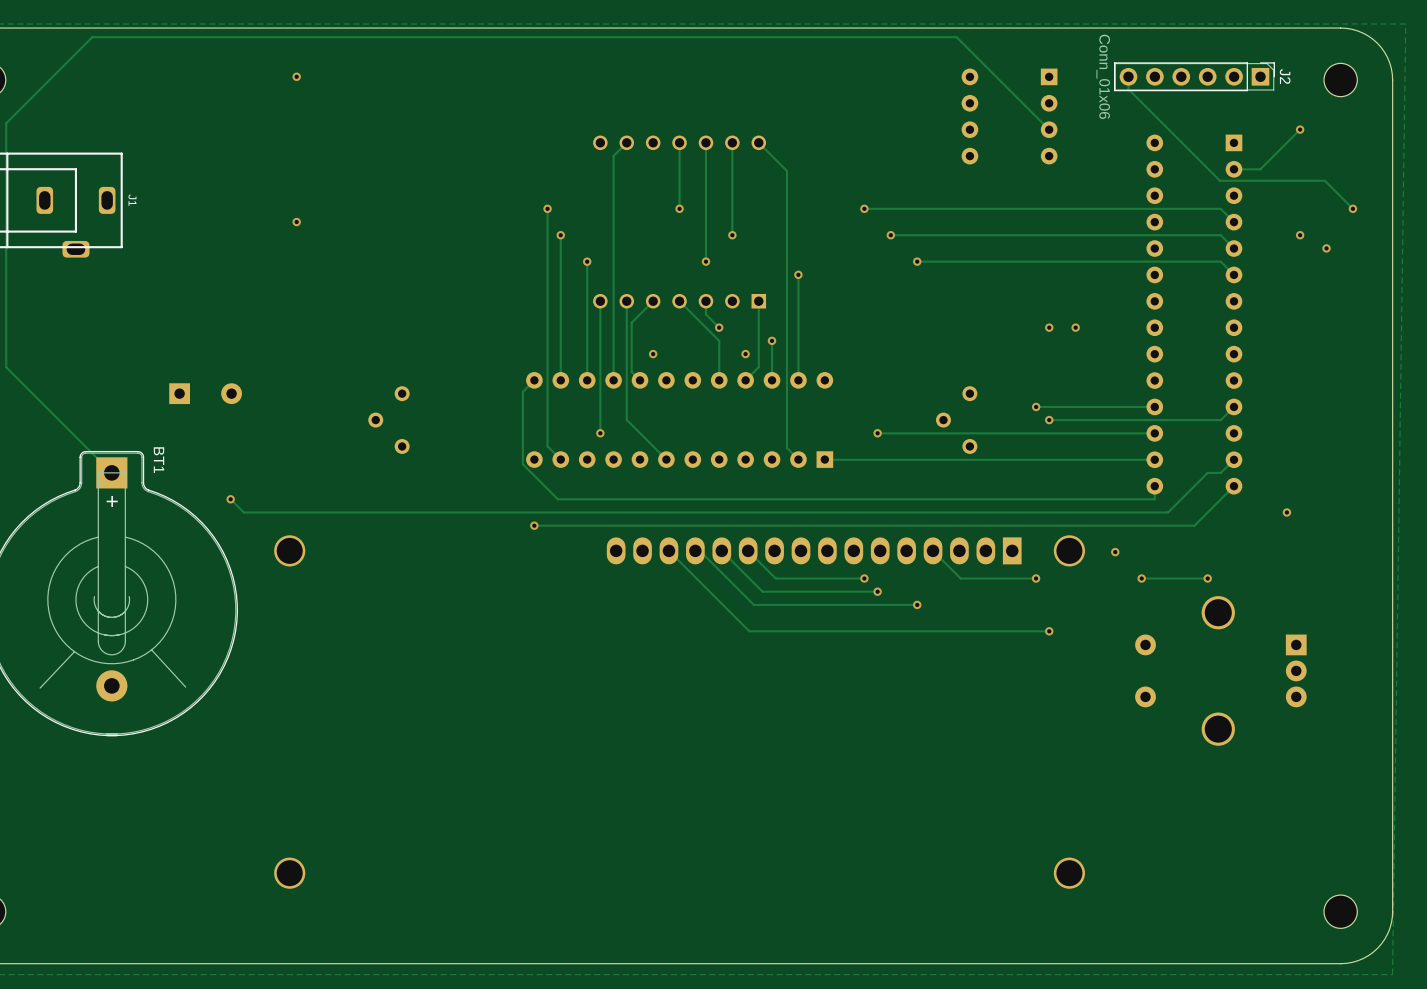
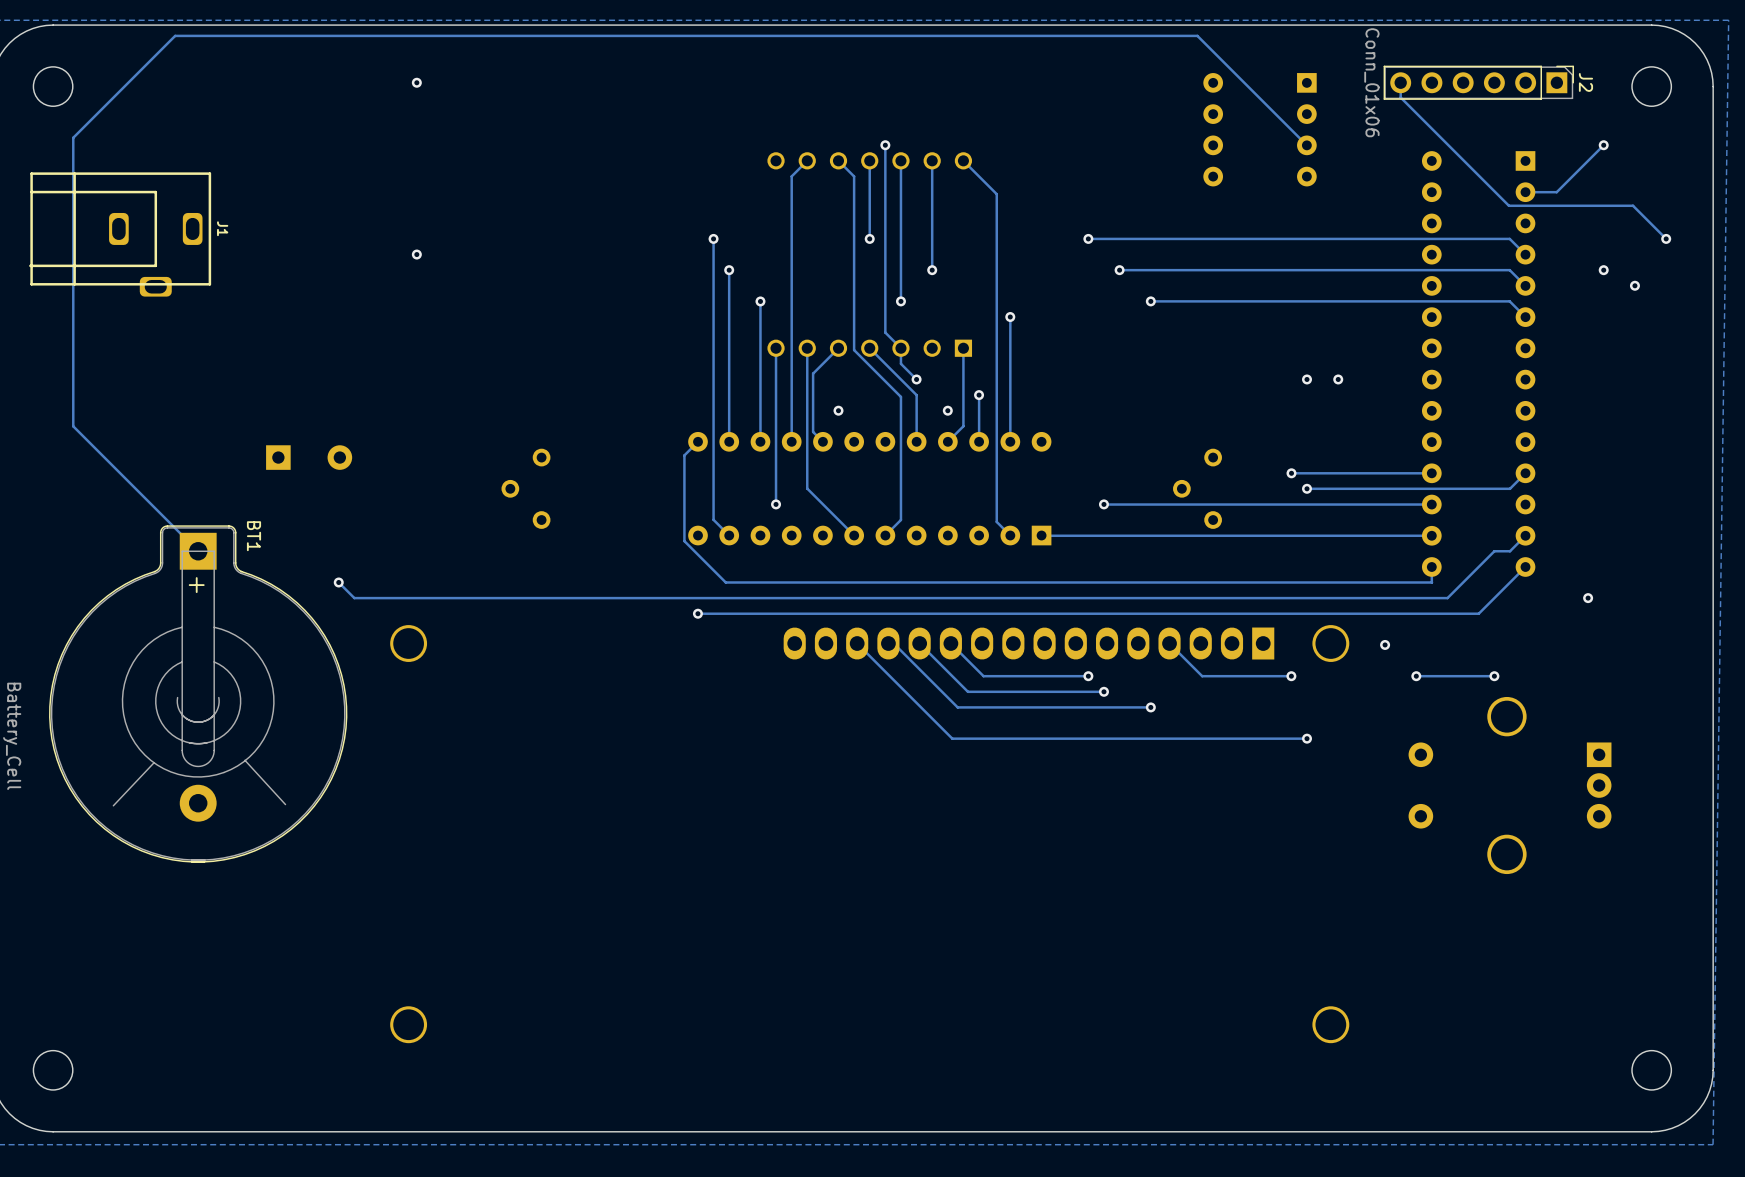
track: none -> (885, 145) (885, 332) (900, 348)
via: none -> (885, 145)
track: none -> (838, 160) (854, 176) (854, 350) (900, 396) (900, 519) (885, 535)

